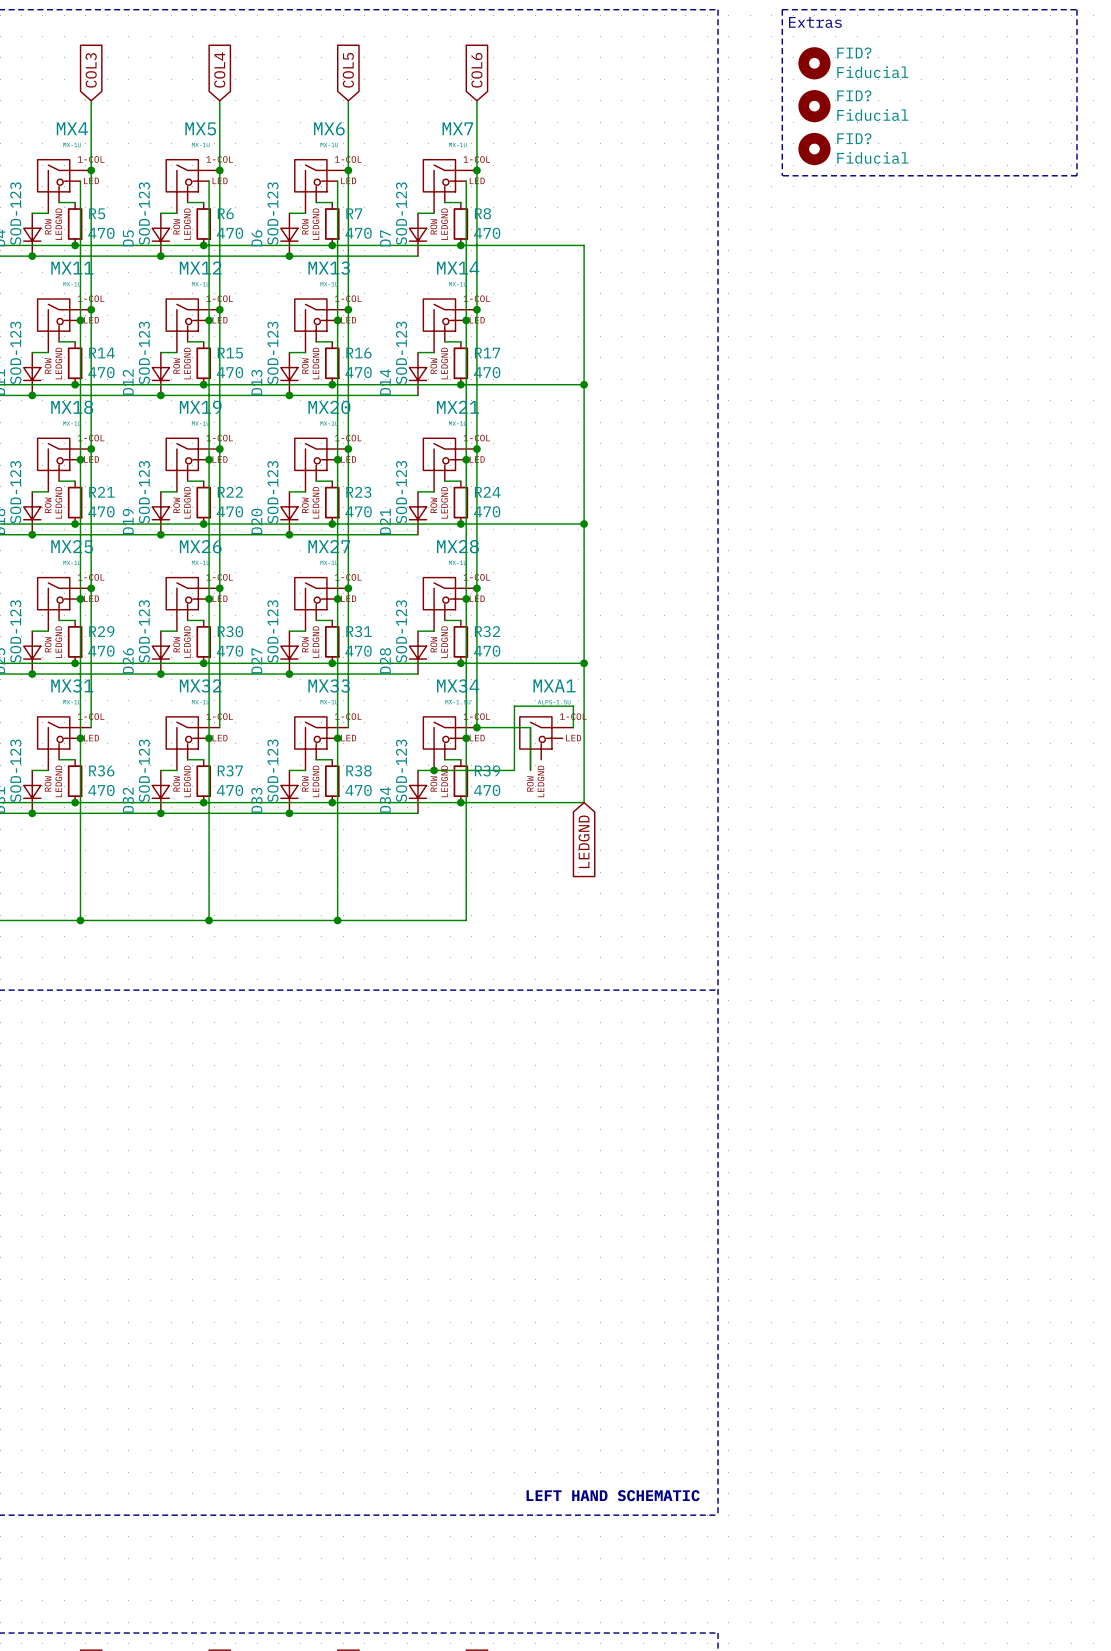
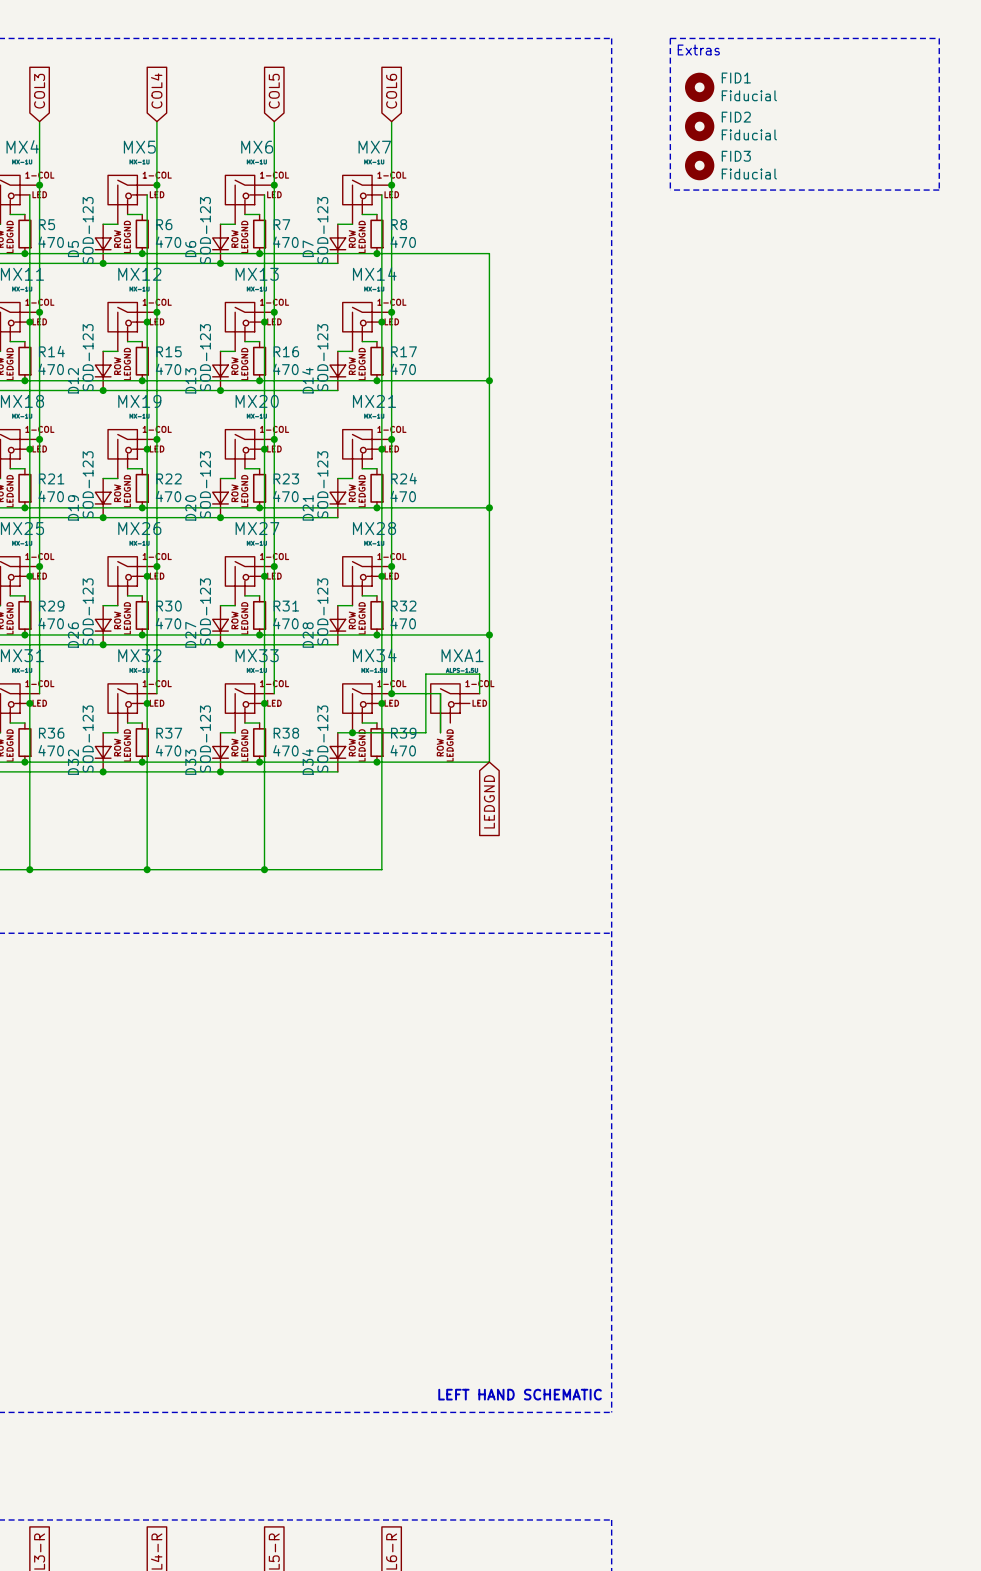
FID? name: FID? (854, 52) -> FID1 (736, 78)
FID? name: FID? (854, 95) -> FID2 (736, 117)
FID? name: FID? (854, 138) -> FID3 (736, 156)

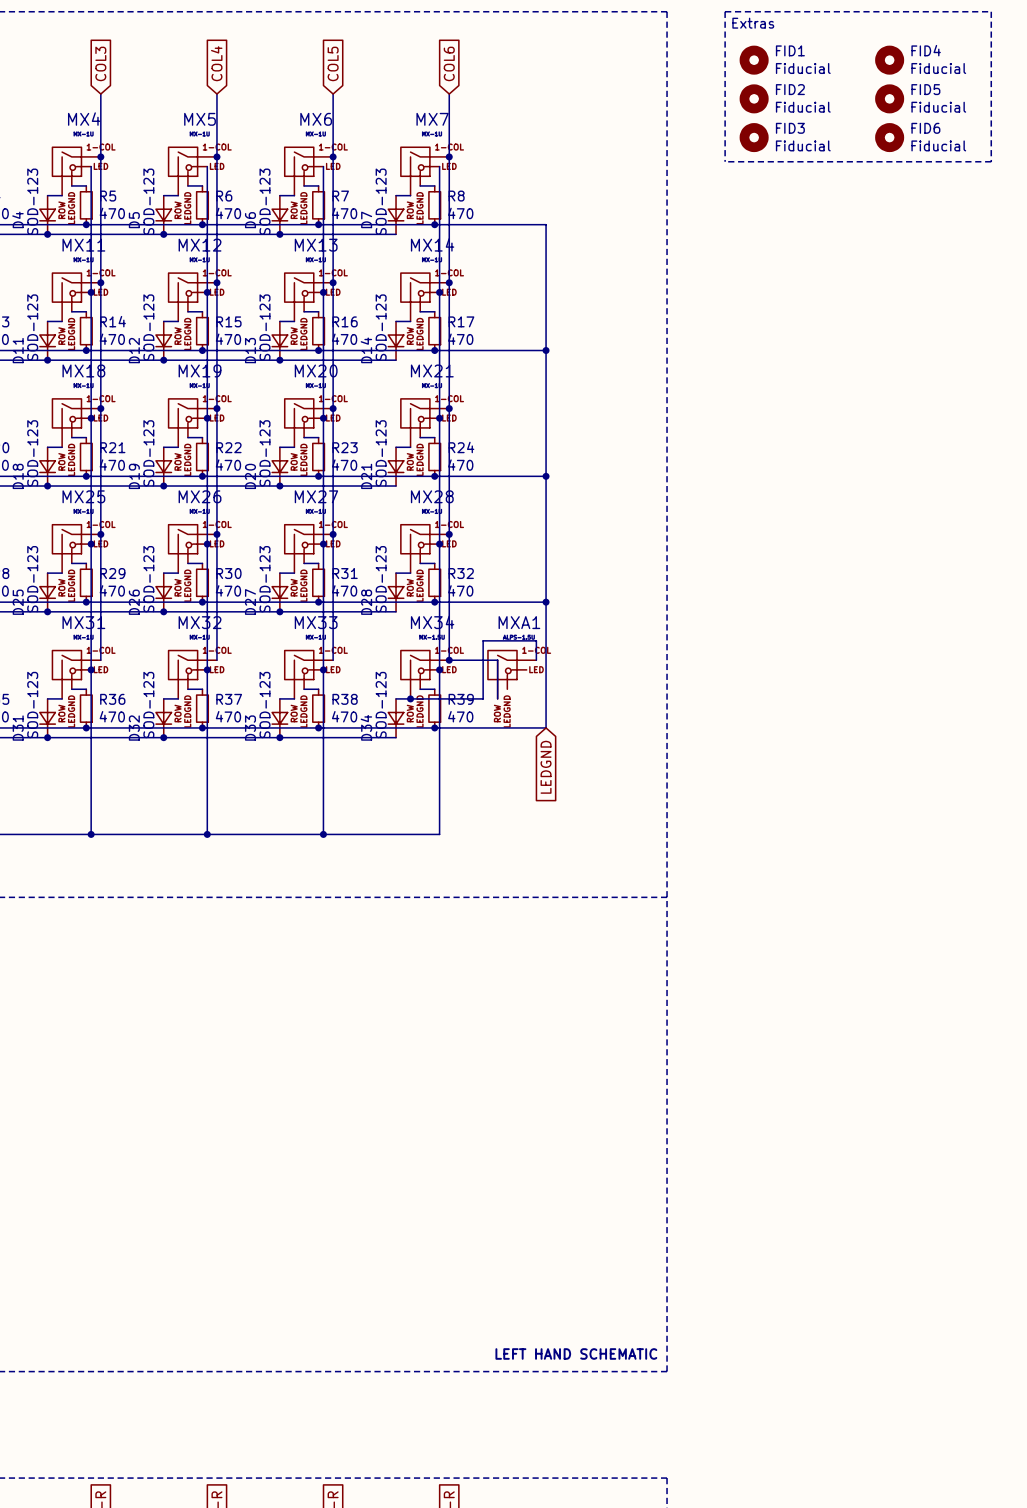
FID4: none -> Fiducial (889, 60)
FID5: none -> Fiducial (889, 98)
FID6: none -> Fiducial (889, 137)

